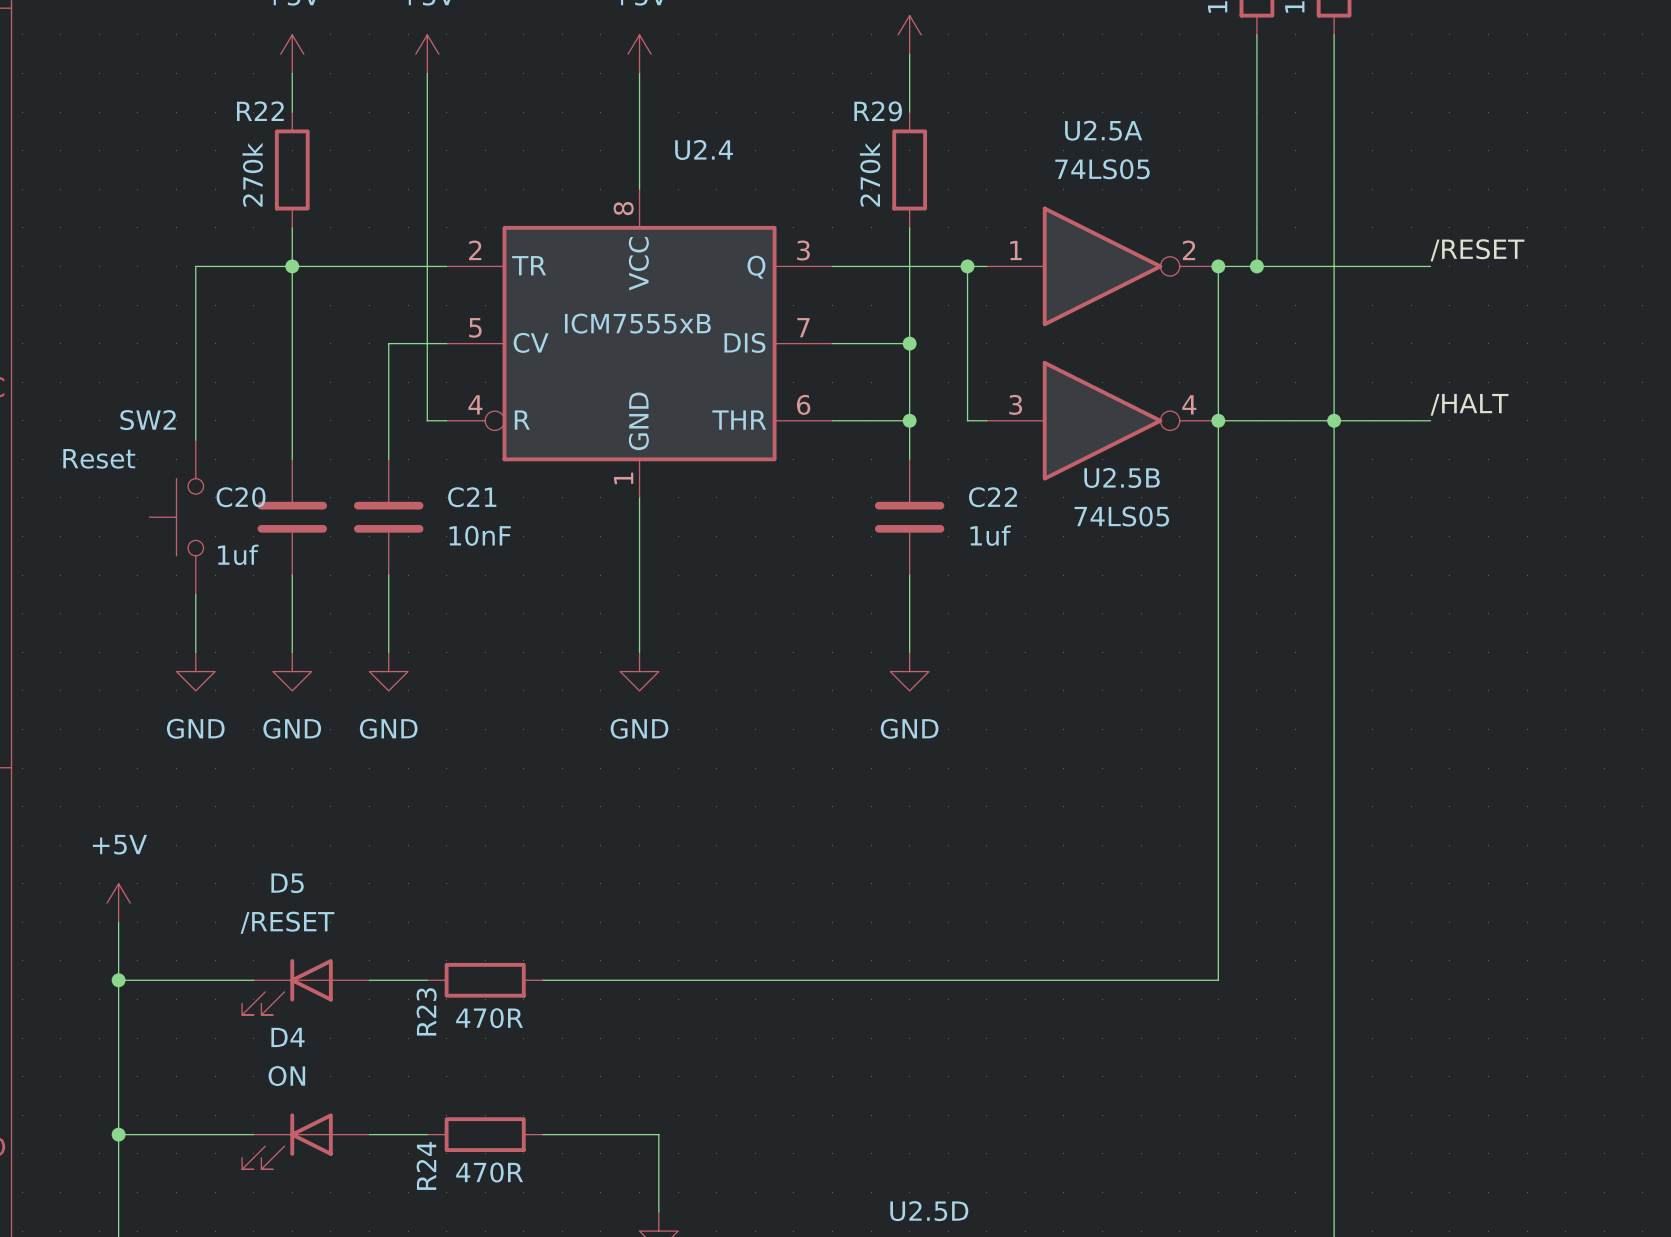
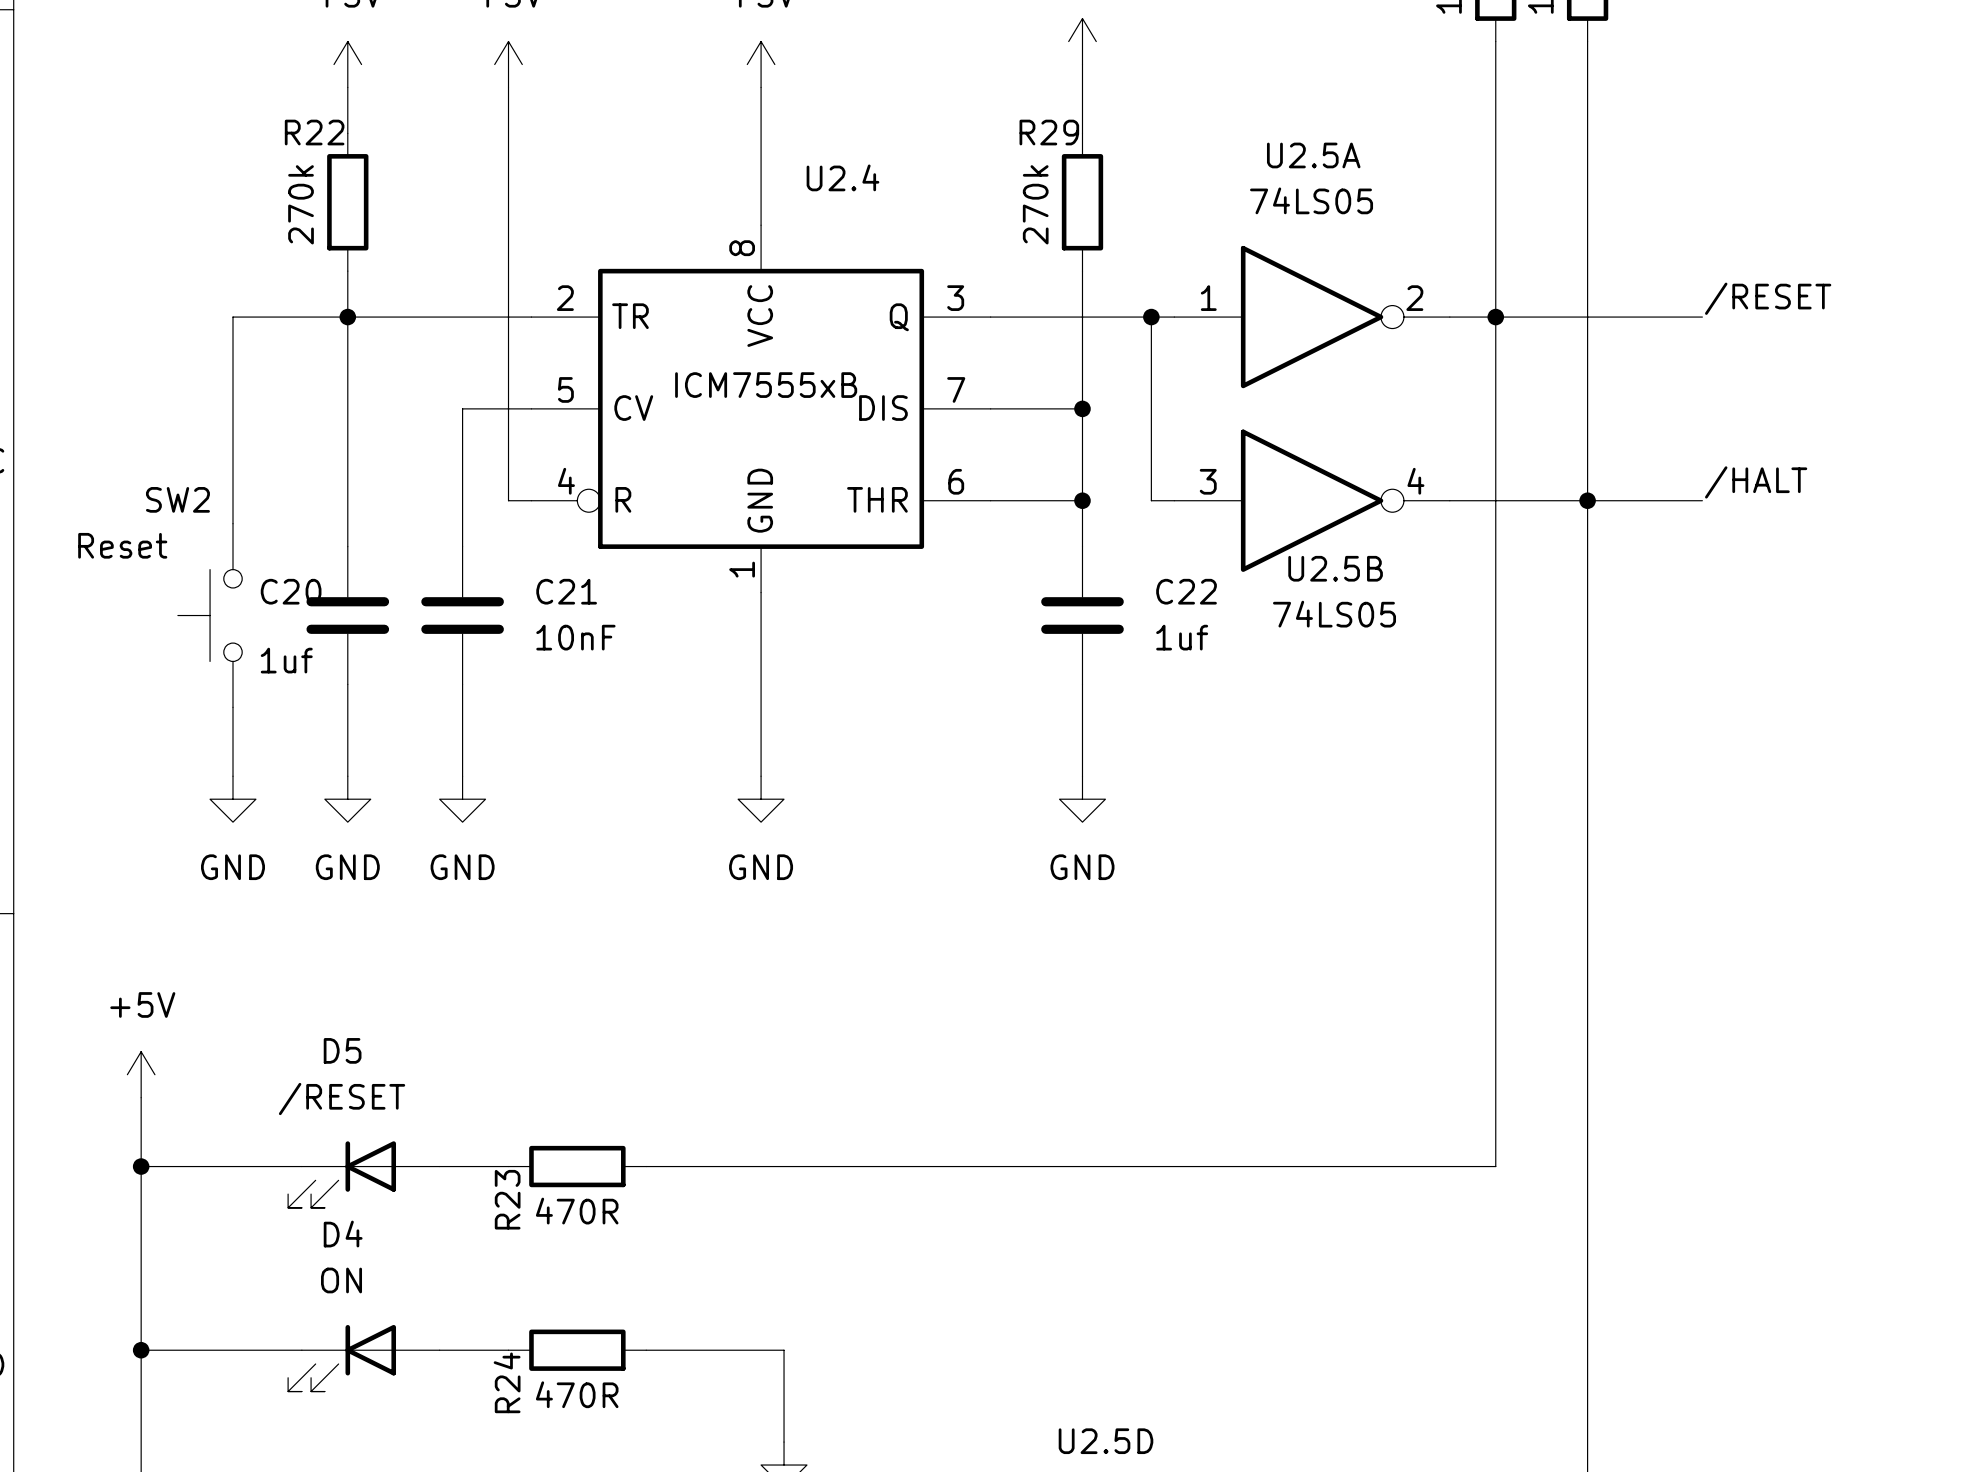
wire: (1218, 266) (1218, 980) -> (1495, 317) (1495, 1166) (1449, 1166)
junction: (1218, 266) -> none
junction: (1218, 420) -> none

